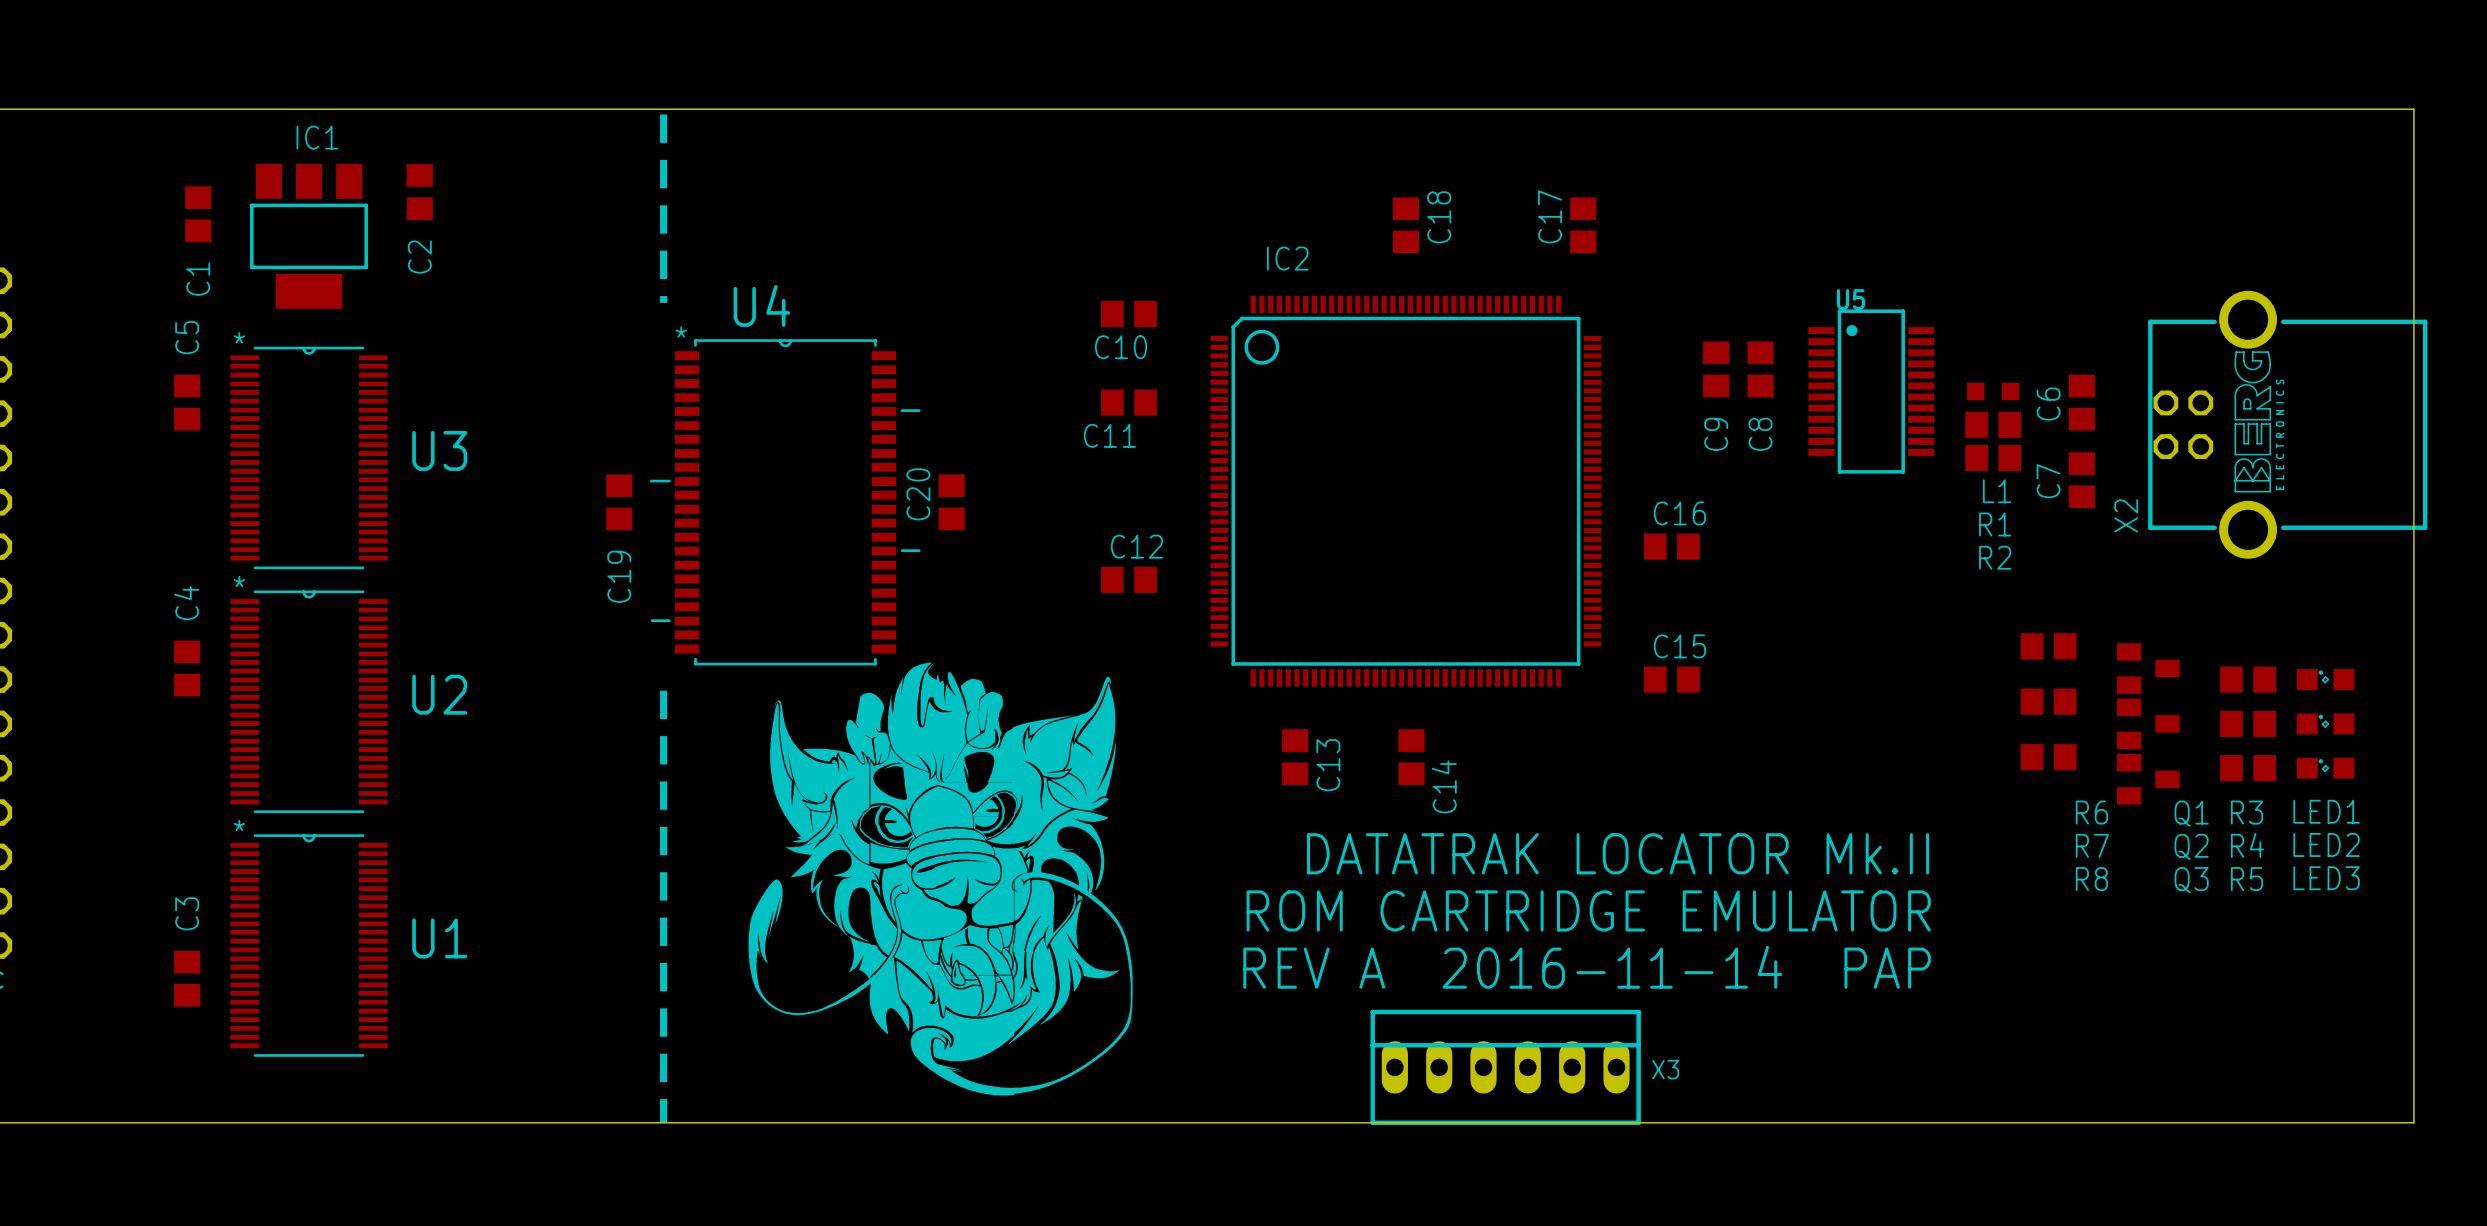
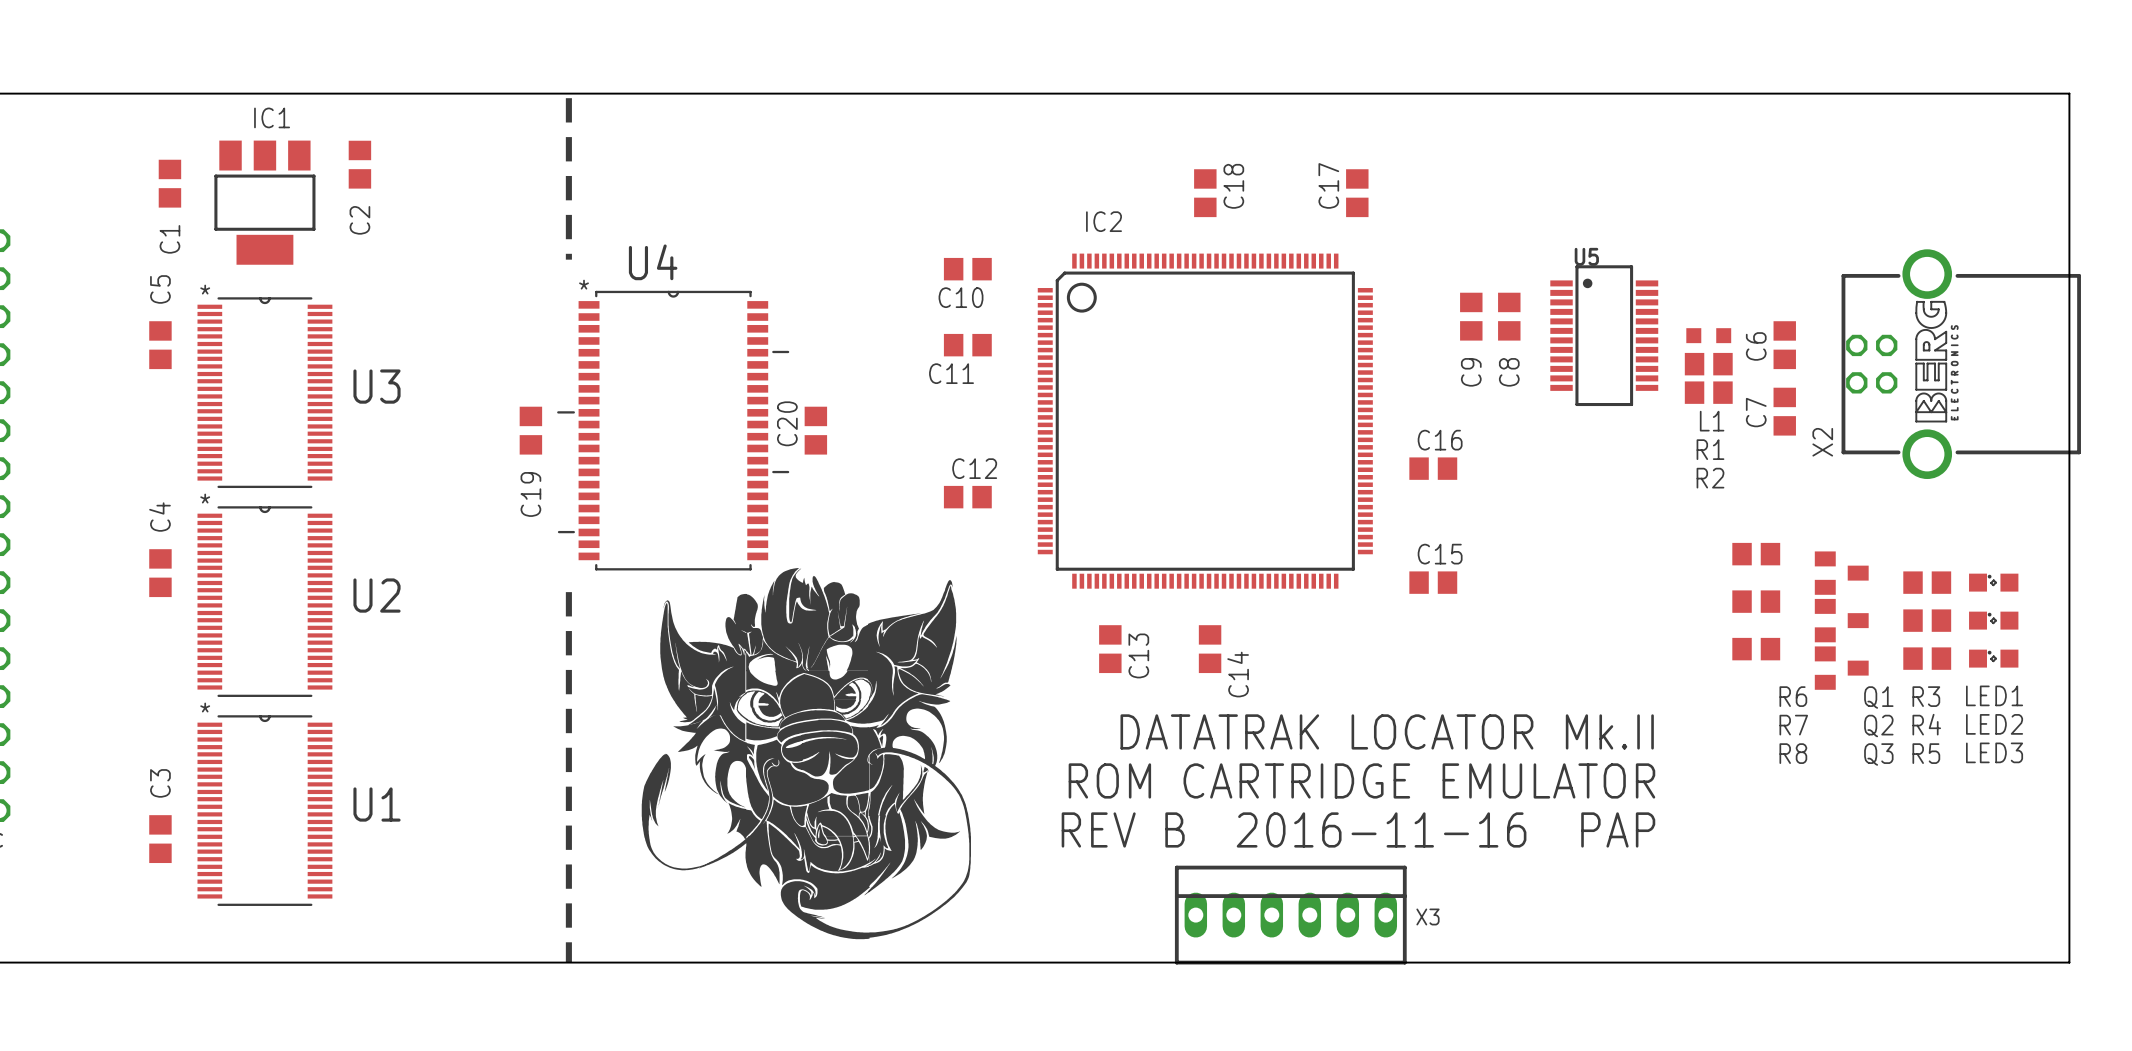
text: REV A 2016-11-14 PAP (1587, 967) -> REV B 2016-11-16 PAP (1358, 829)

